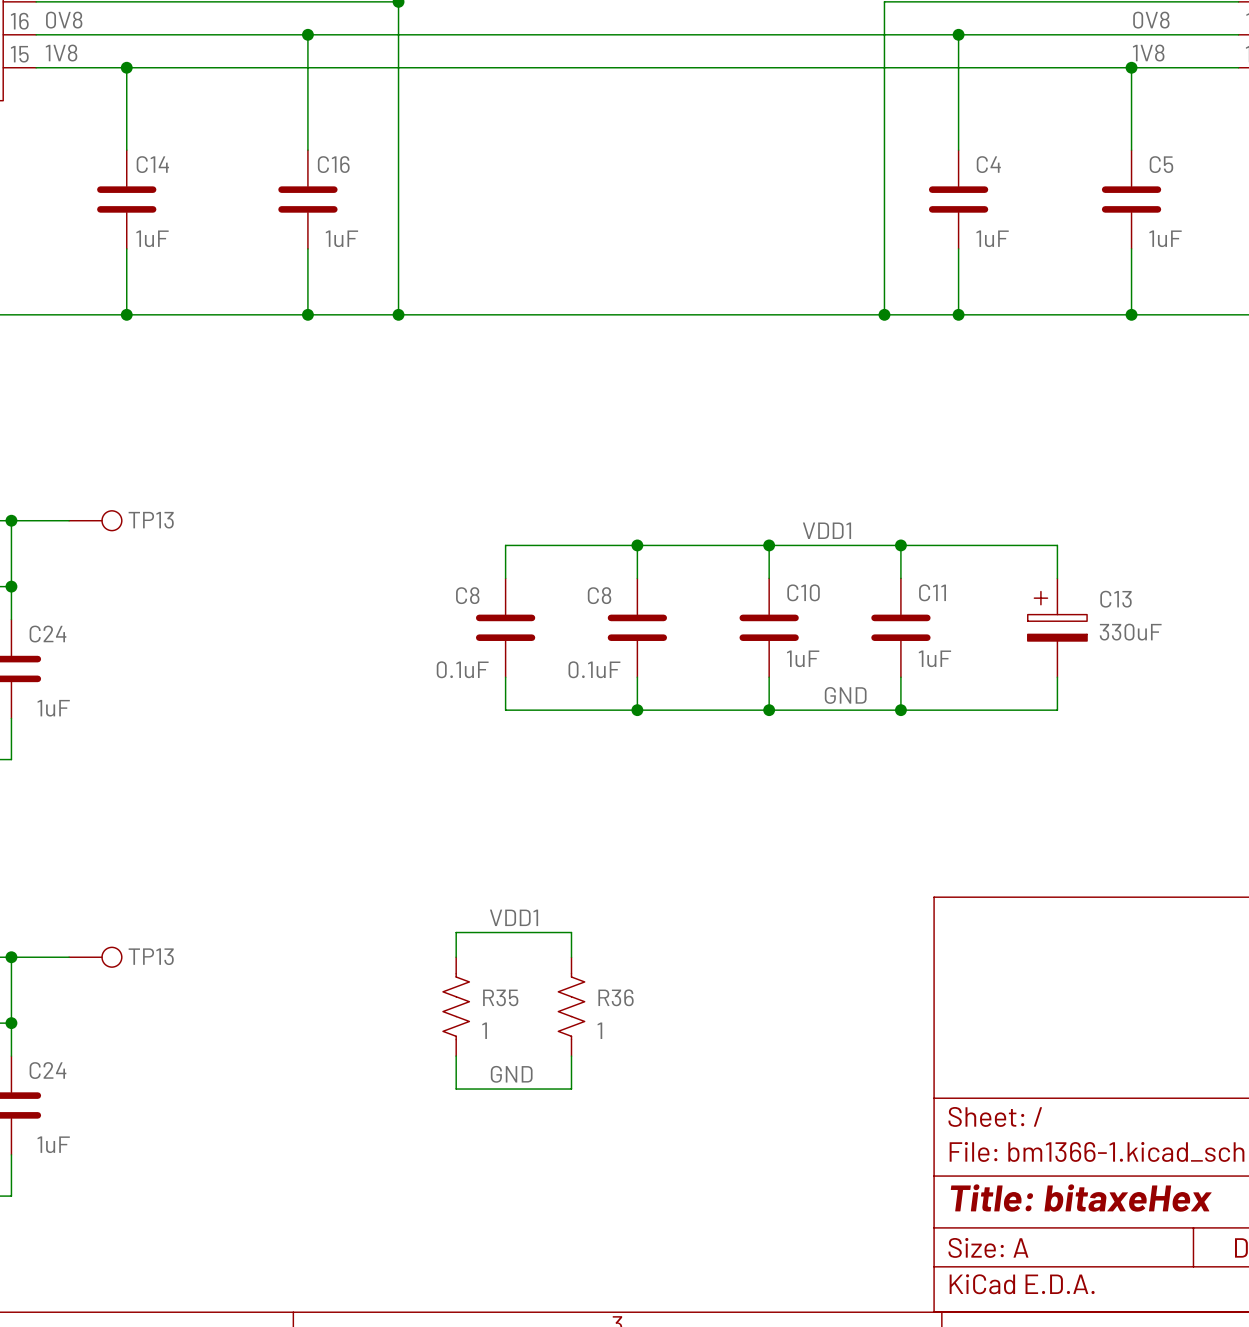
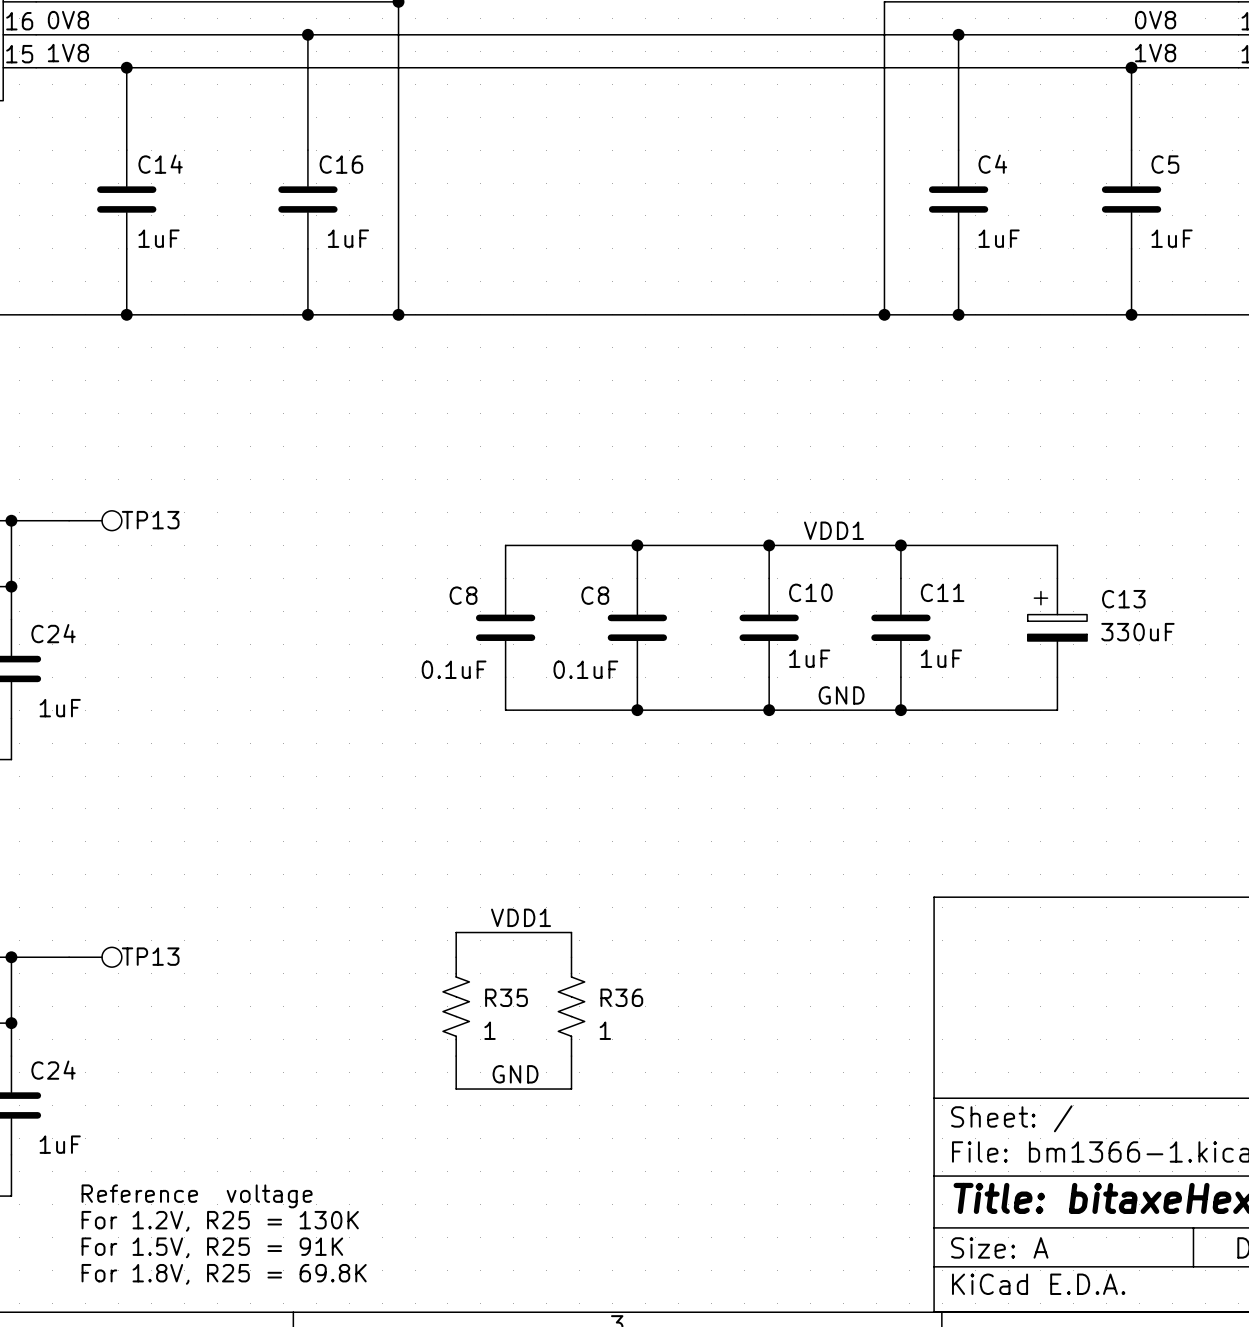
text: none -> Reference voltage (197, 1196)
text: none -> For 1.2V, R25 = 130K (220, 1221)
text: none -> For 1.5V, R25 = 91K (212, 1247)
text: none -> For 1.8V, R25 = 69.8K (224, 1274)

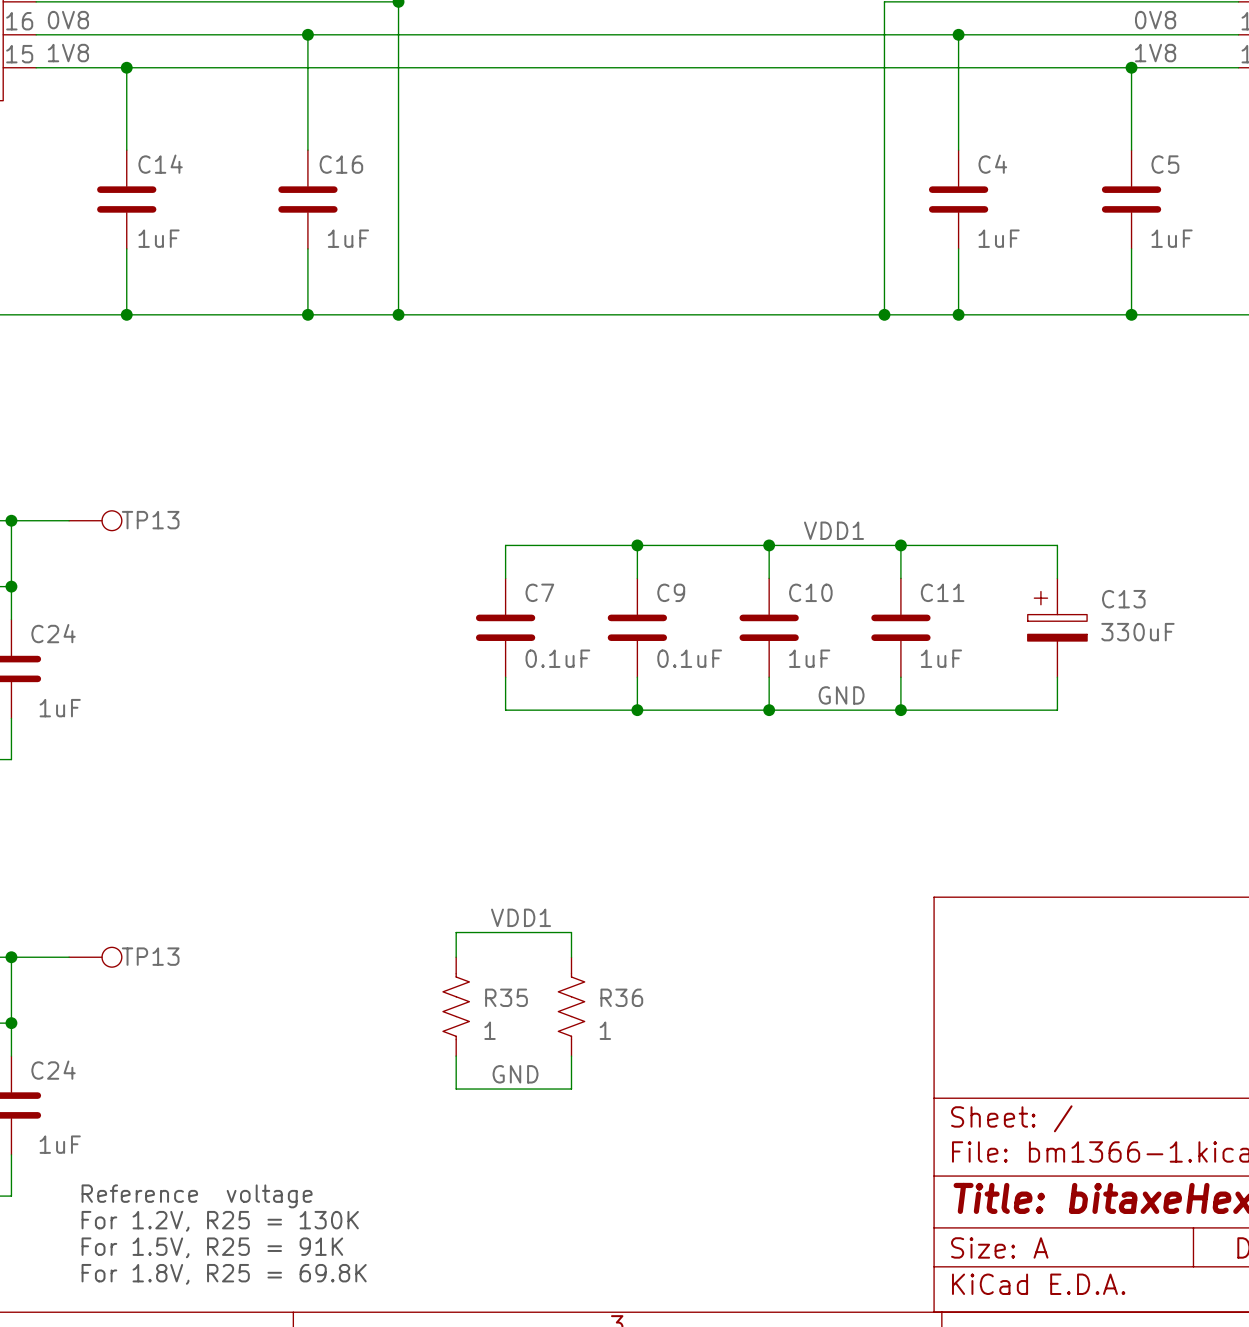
C8 name: C8 (463, 595) -> C7 (539, 592)
C8 name: C8 (595, 595) -> C9 (671, 592)
C8 value position: 0.1uF (454, 669) -> 0.1uF (557, 658)
C8 value position: 0.1uF (585, 669) -> 0.1uF (689, 658)

